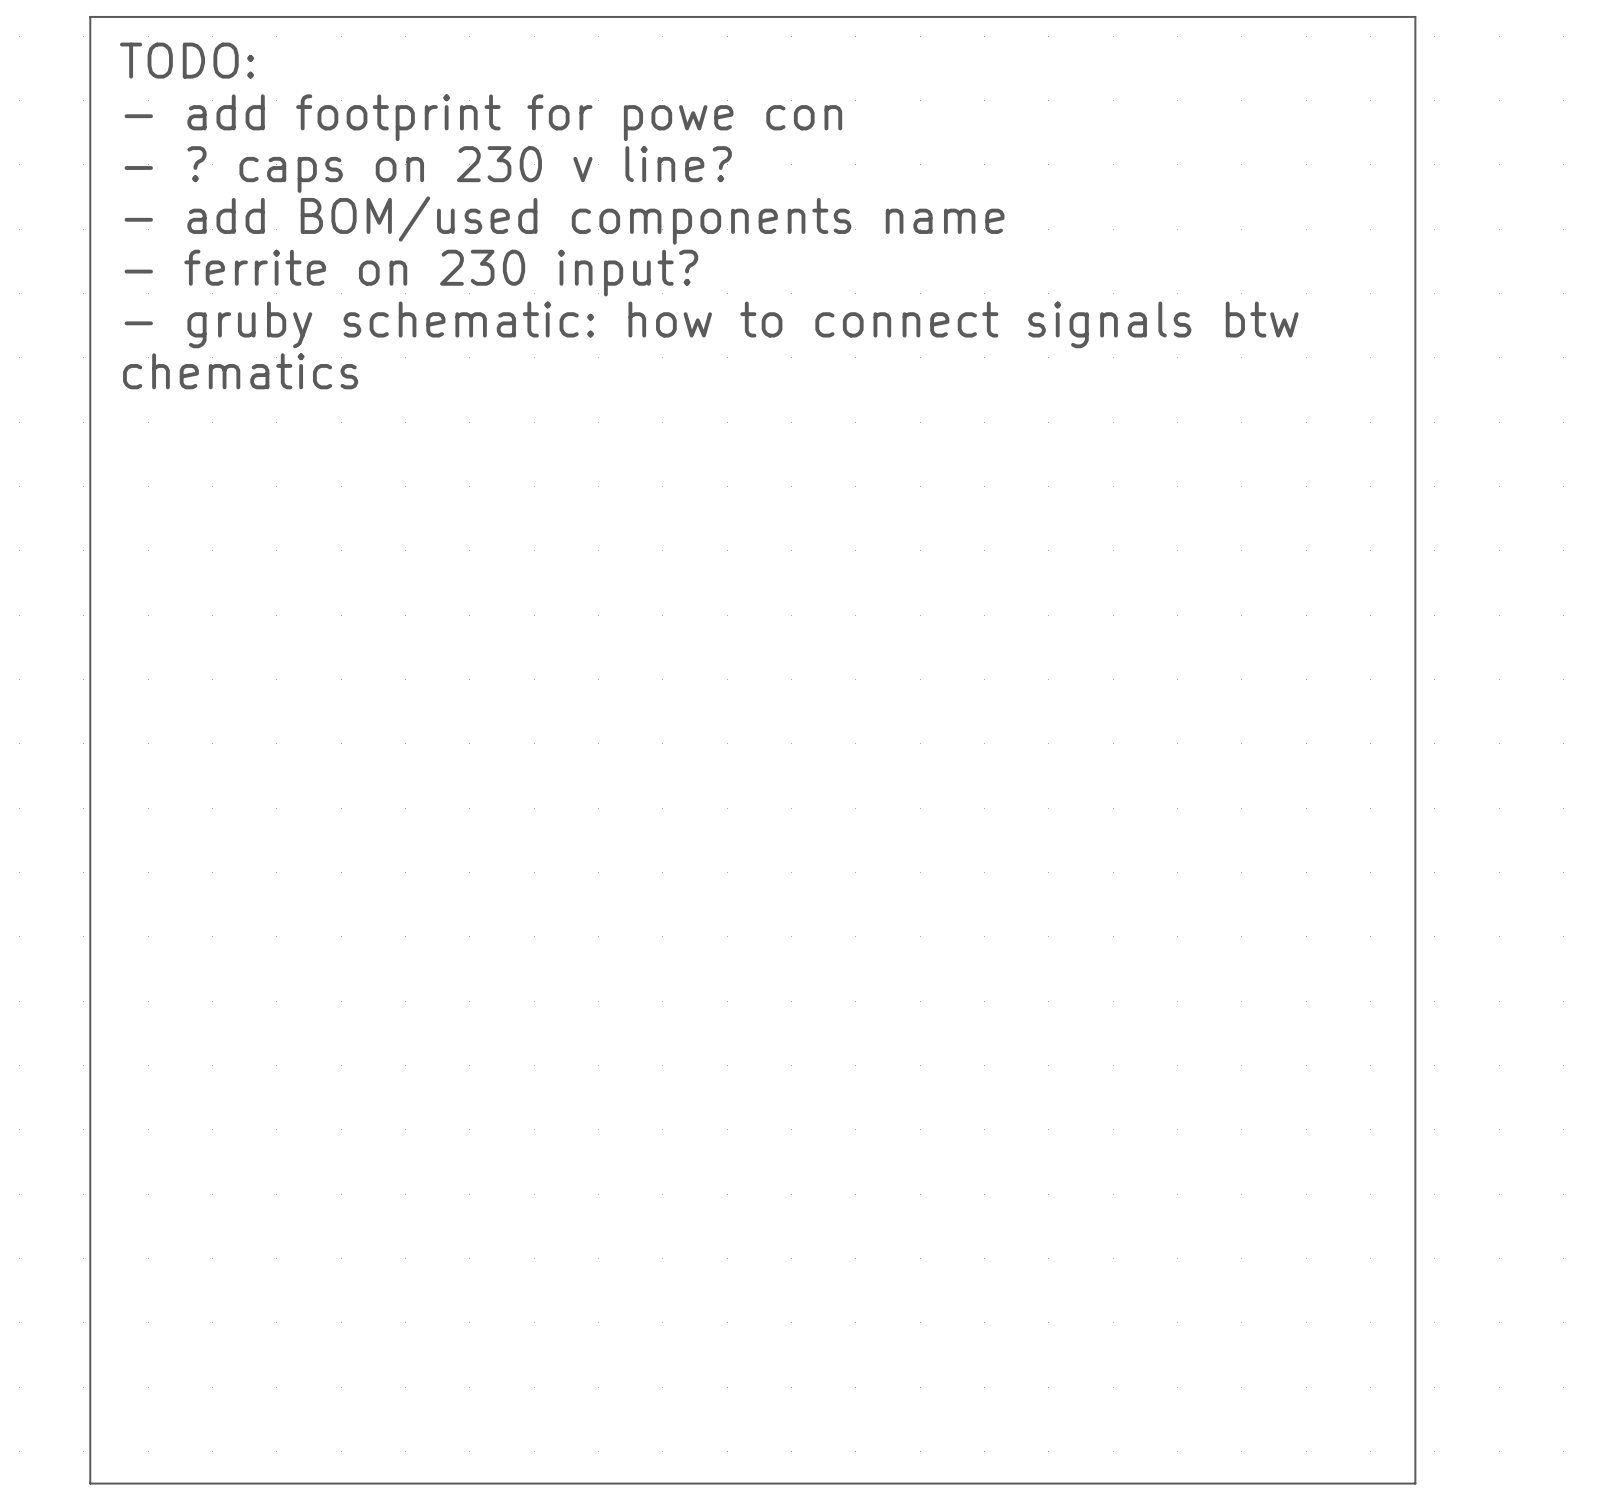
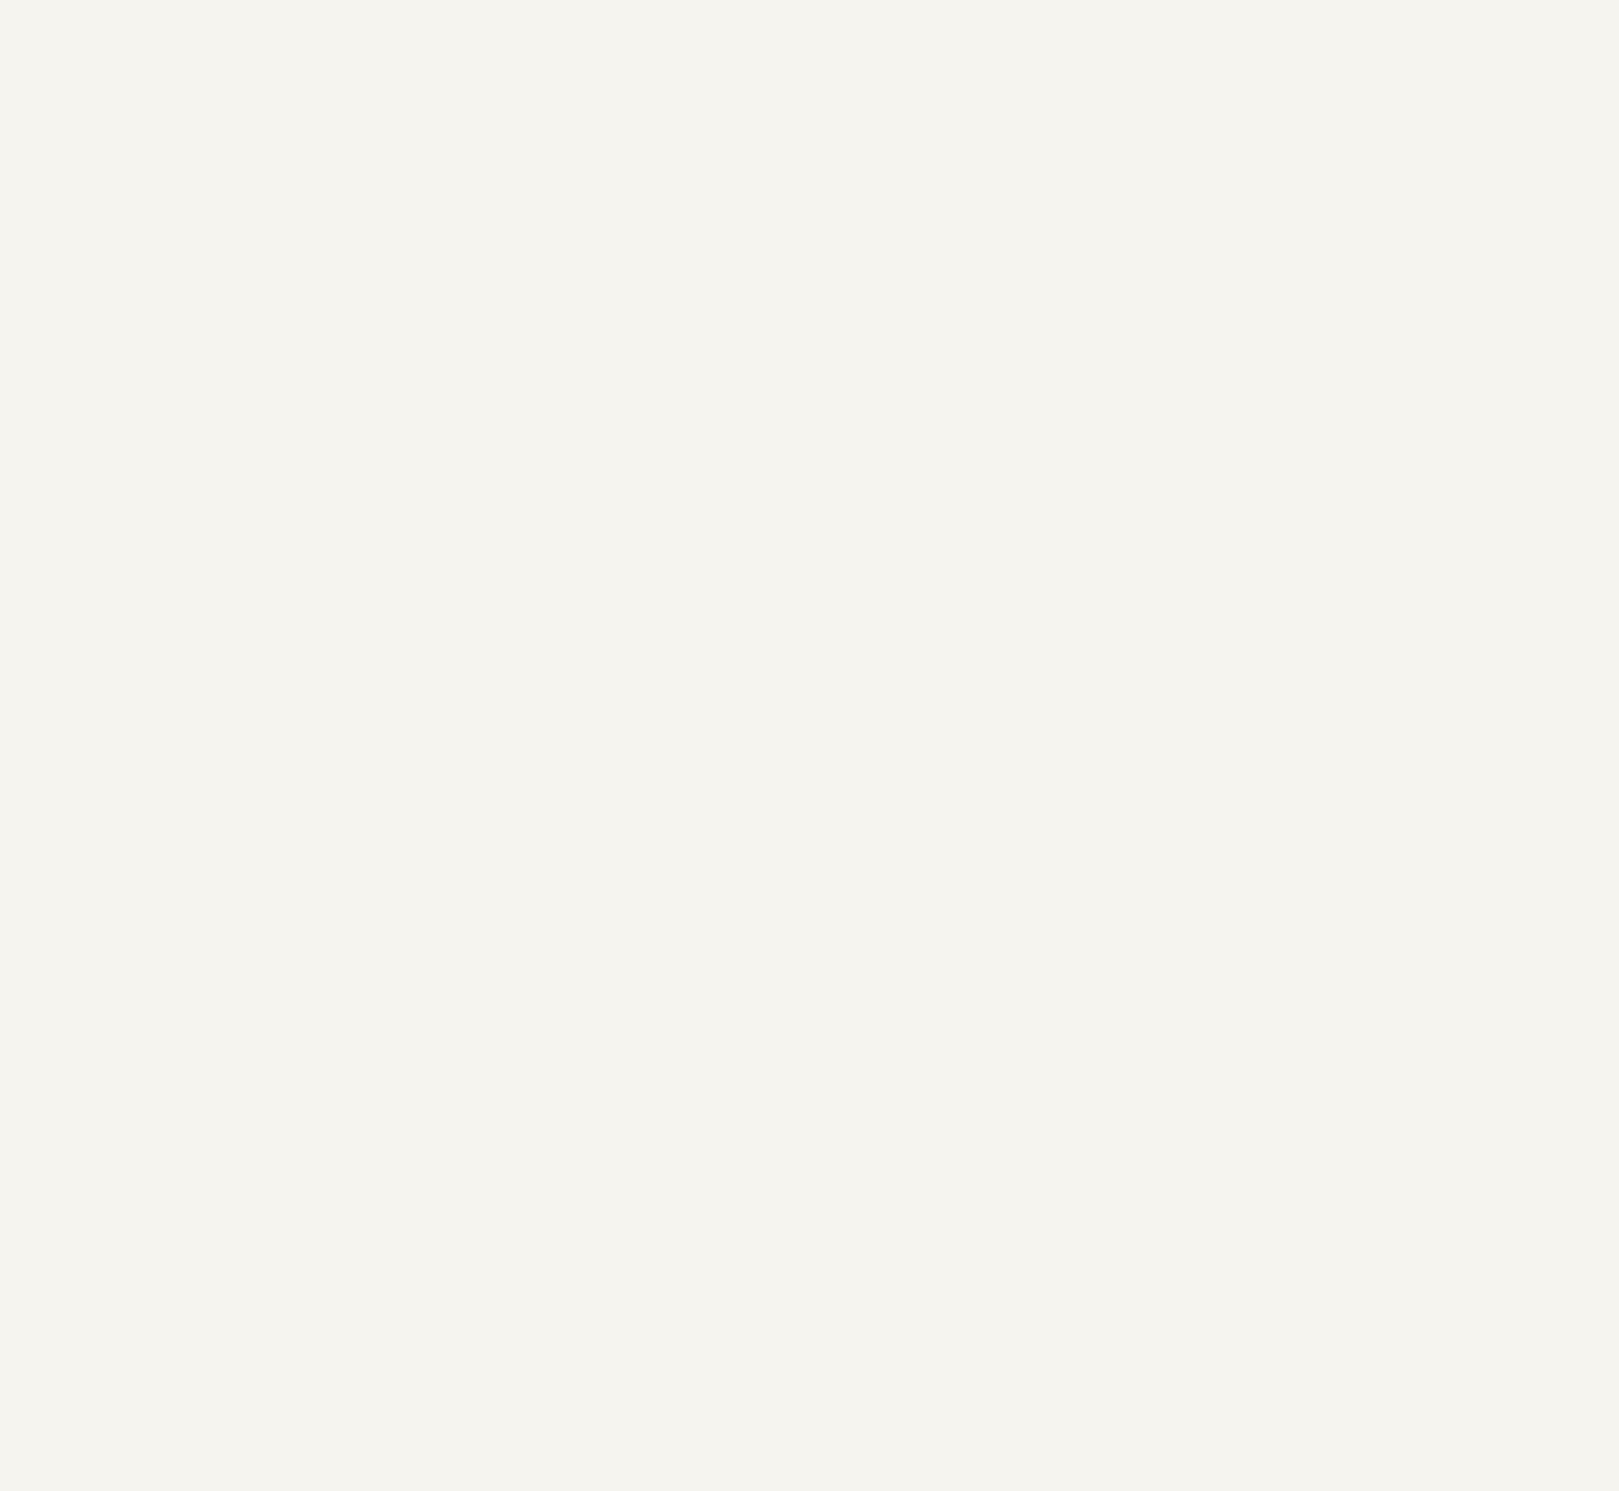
line: (90, 16) (1415, 16) (1415, 1483) (90, 1483) (90, 16) -> none
text: TODO: (187, 60) -> none
text: - add footprint for powe con (483, 117) -> none
text: - ? caps on 230 v line? (428, 169) -> none
text: - add BOM/used components name (564, 220) -> none
text: - ferrite on 230 input? (411, 273) -> none
text: - gruby schematic: how to connect signals btw (711, 324) -> none
text: chematics (240, 371) -> none

